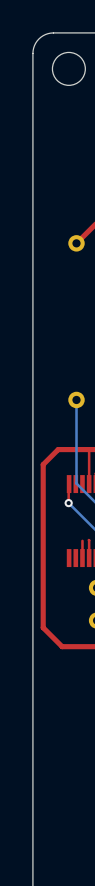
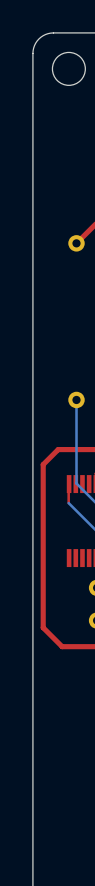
top track: (88, 449) (89, 484) -> none
via: (68, 503) -> none
top track: (82, 540) (82, 558) -> none
top track: (88, 540) (89, 558) -> none

